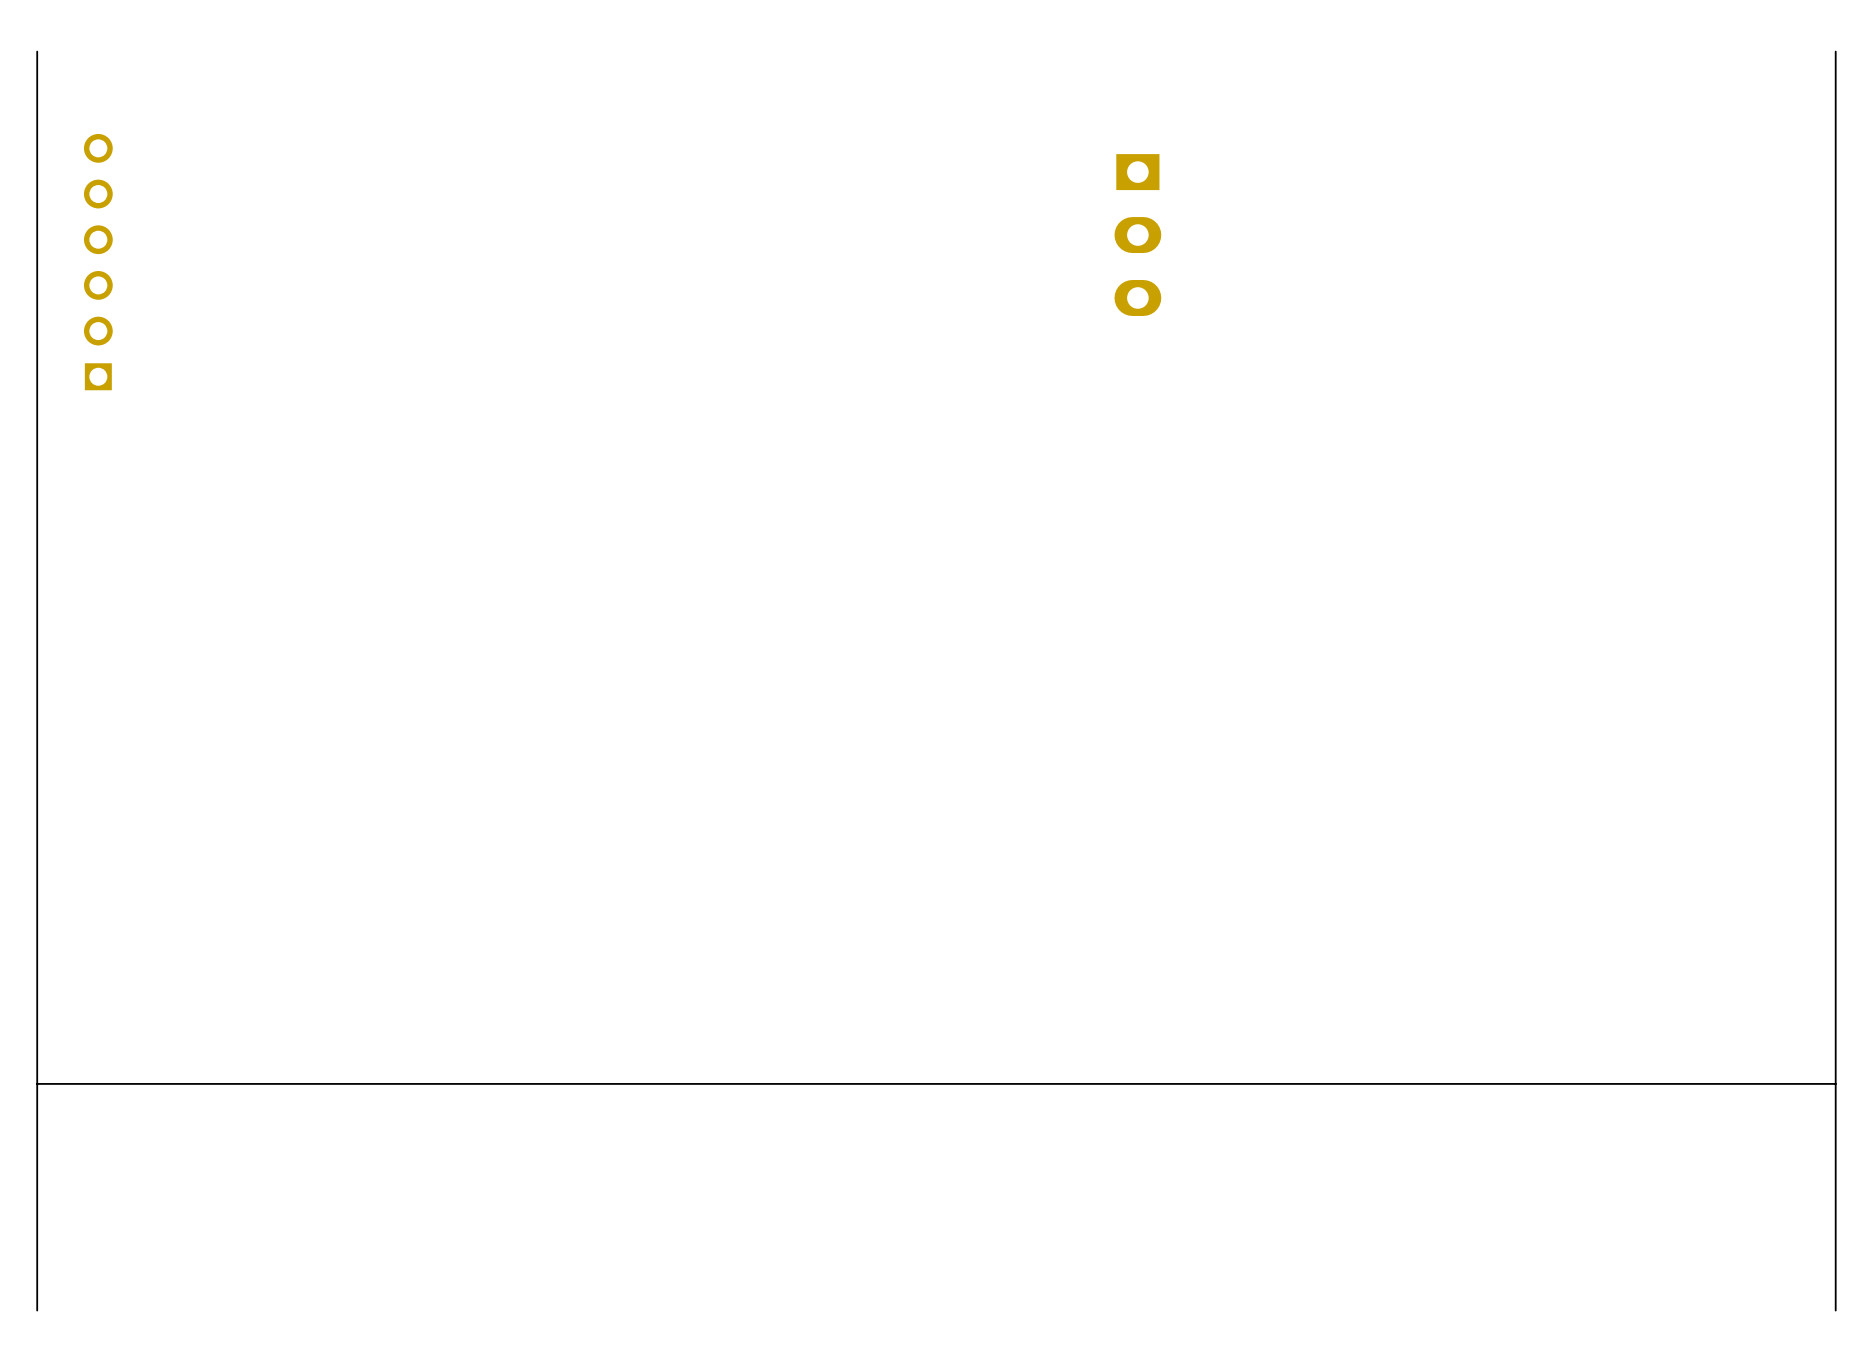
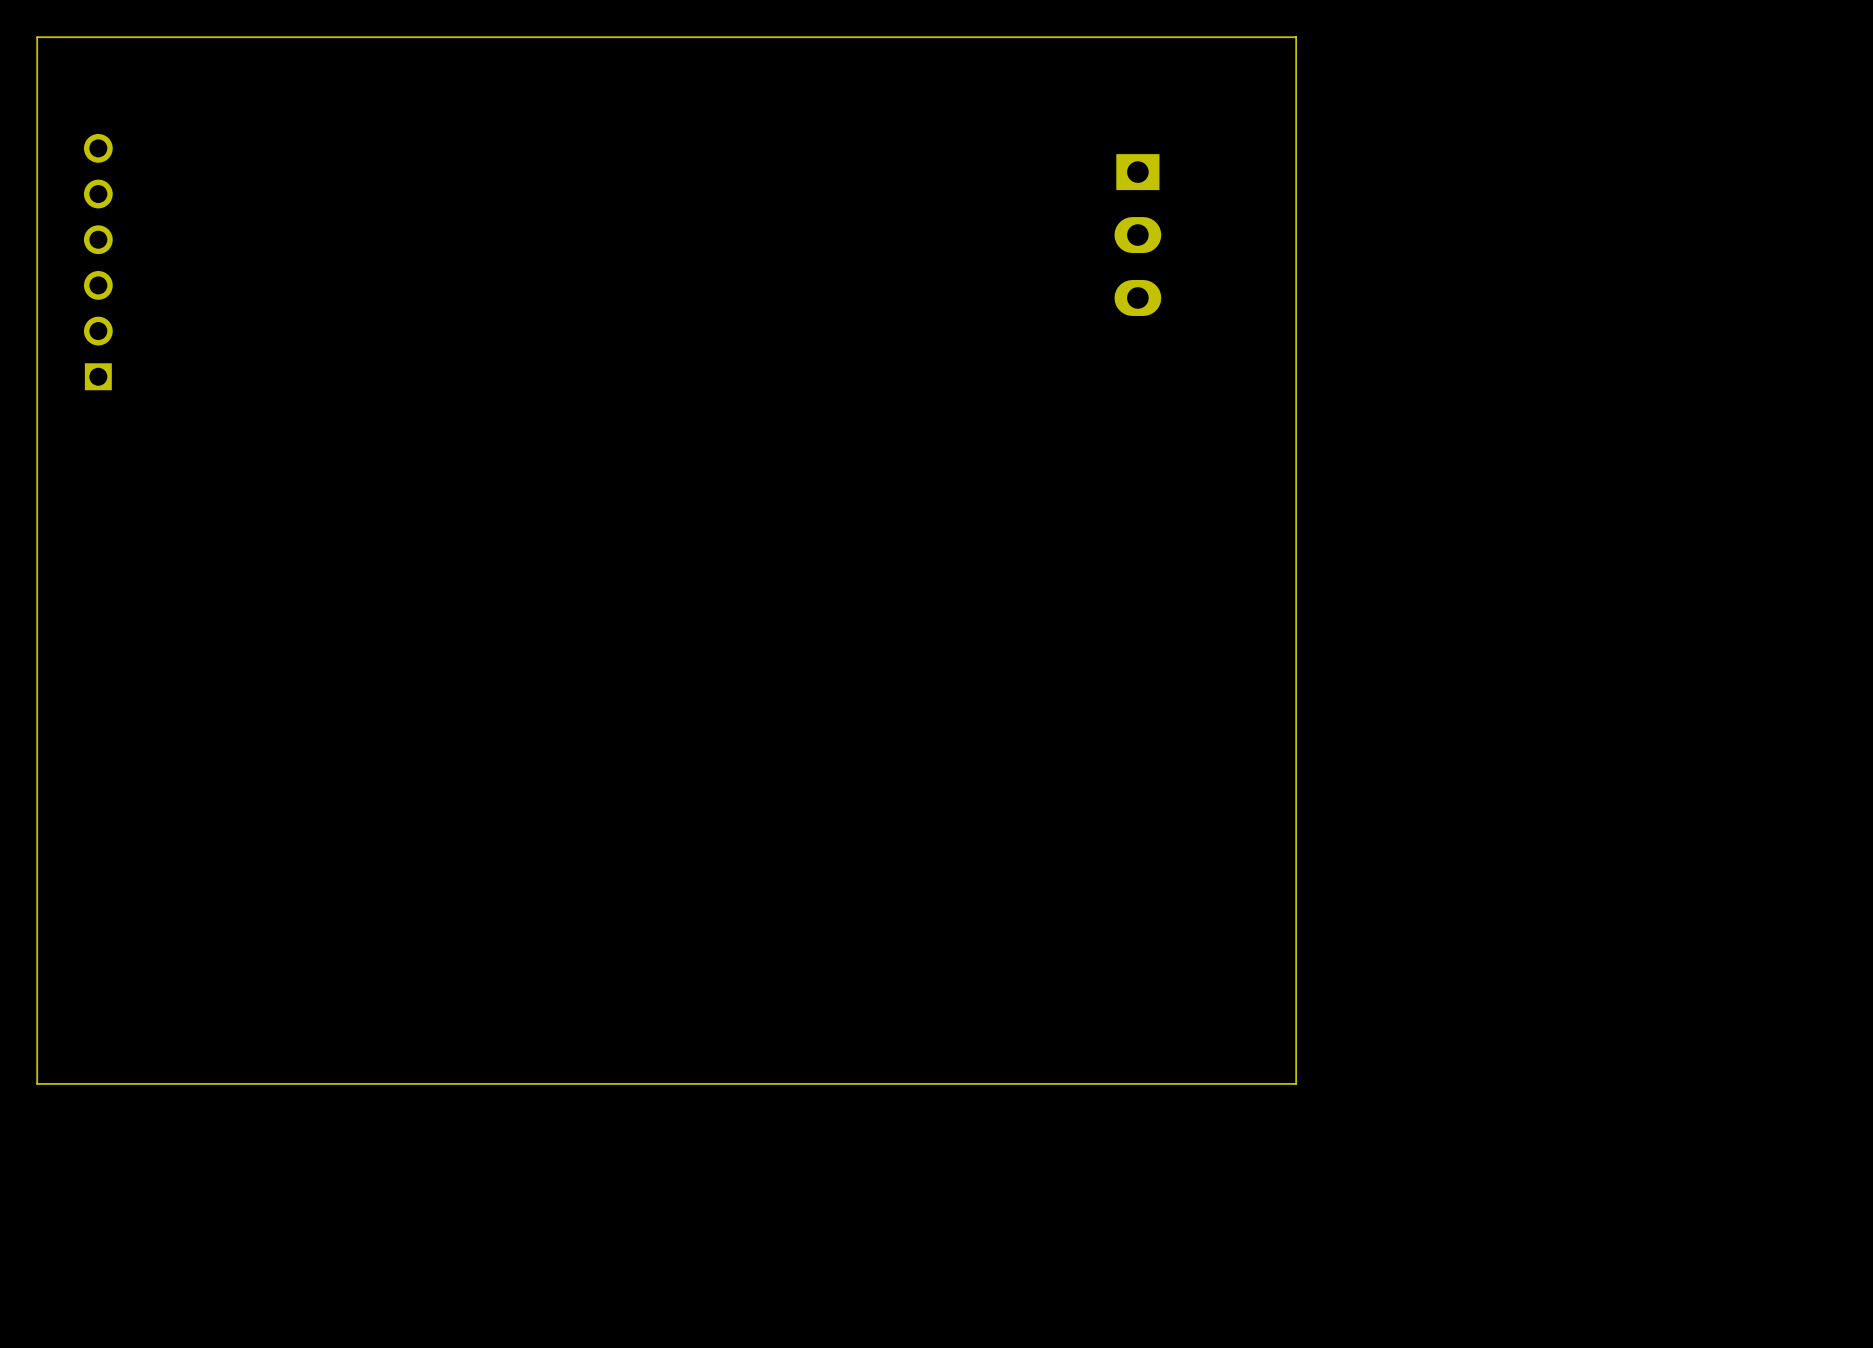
board edge: (1835, 51) (1835, 1310) -> none
board edge: (37, 1083) (37, 1310) -> none
board edge: (1835, 1083) (1296, 1083) -> (37, 51) (37, 37) (1296, 37) (1296, 1083)

